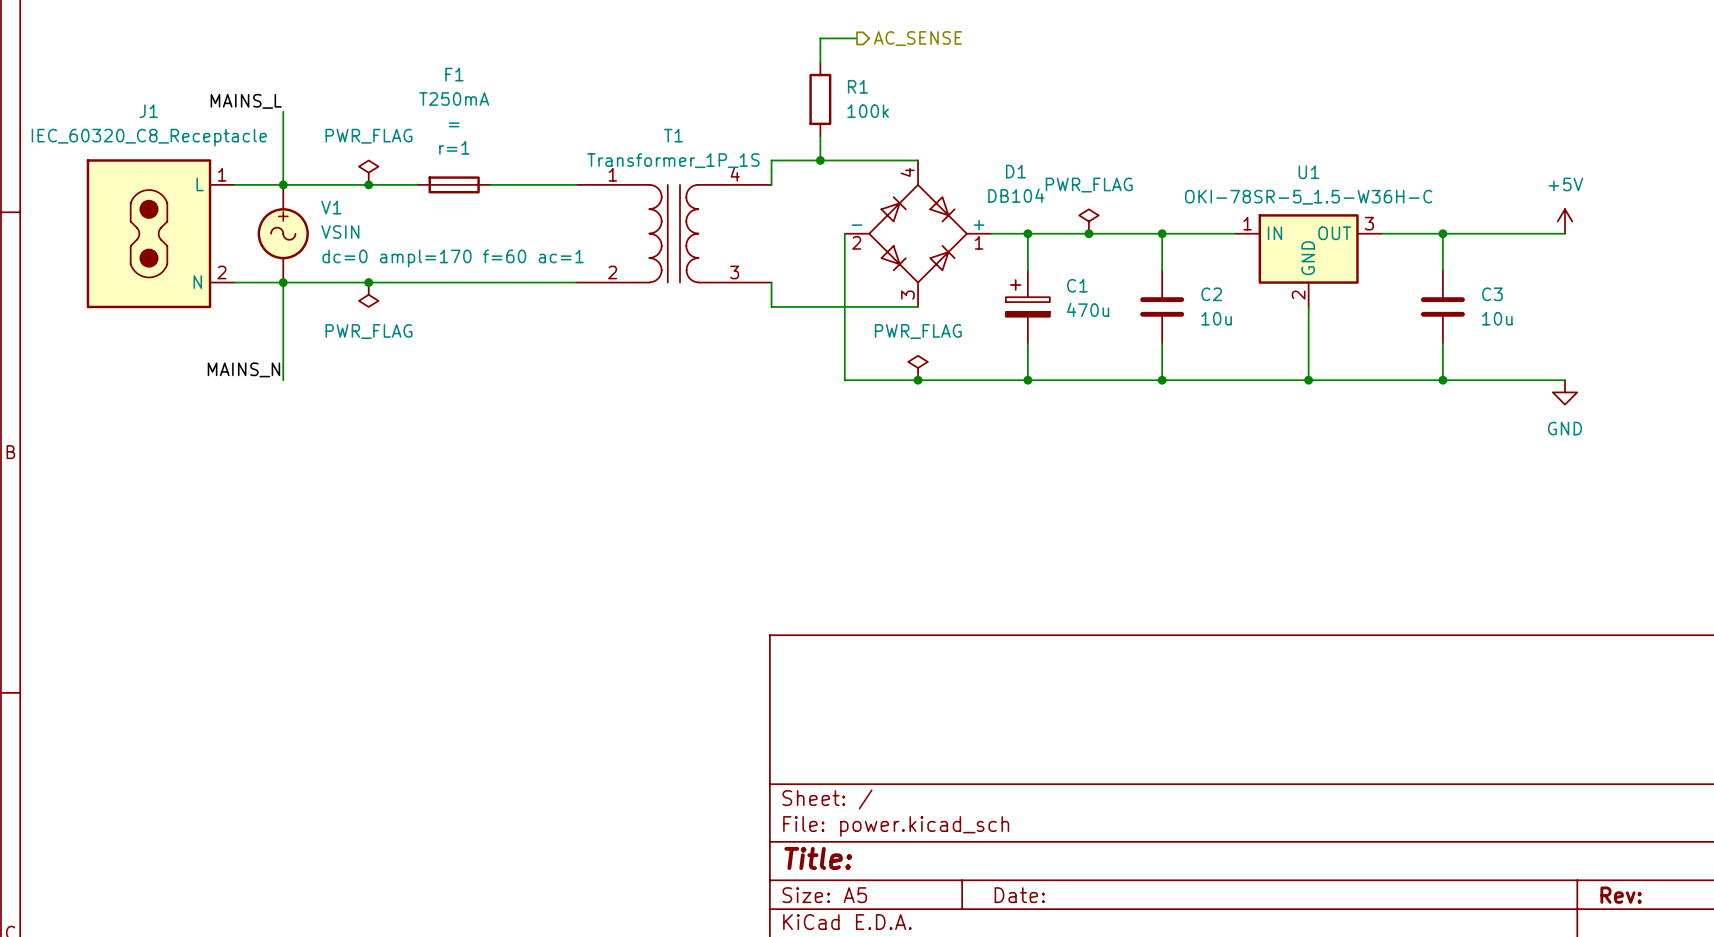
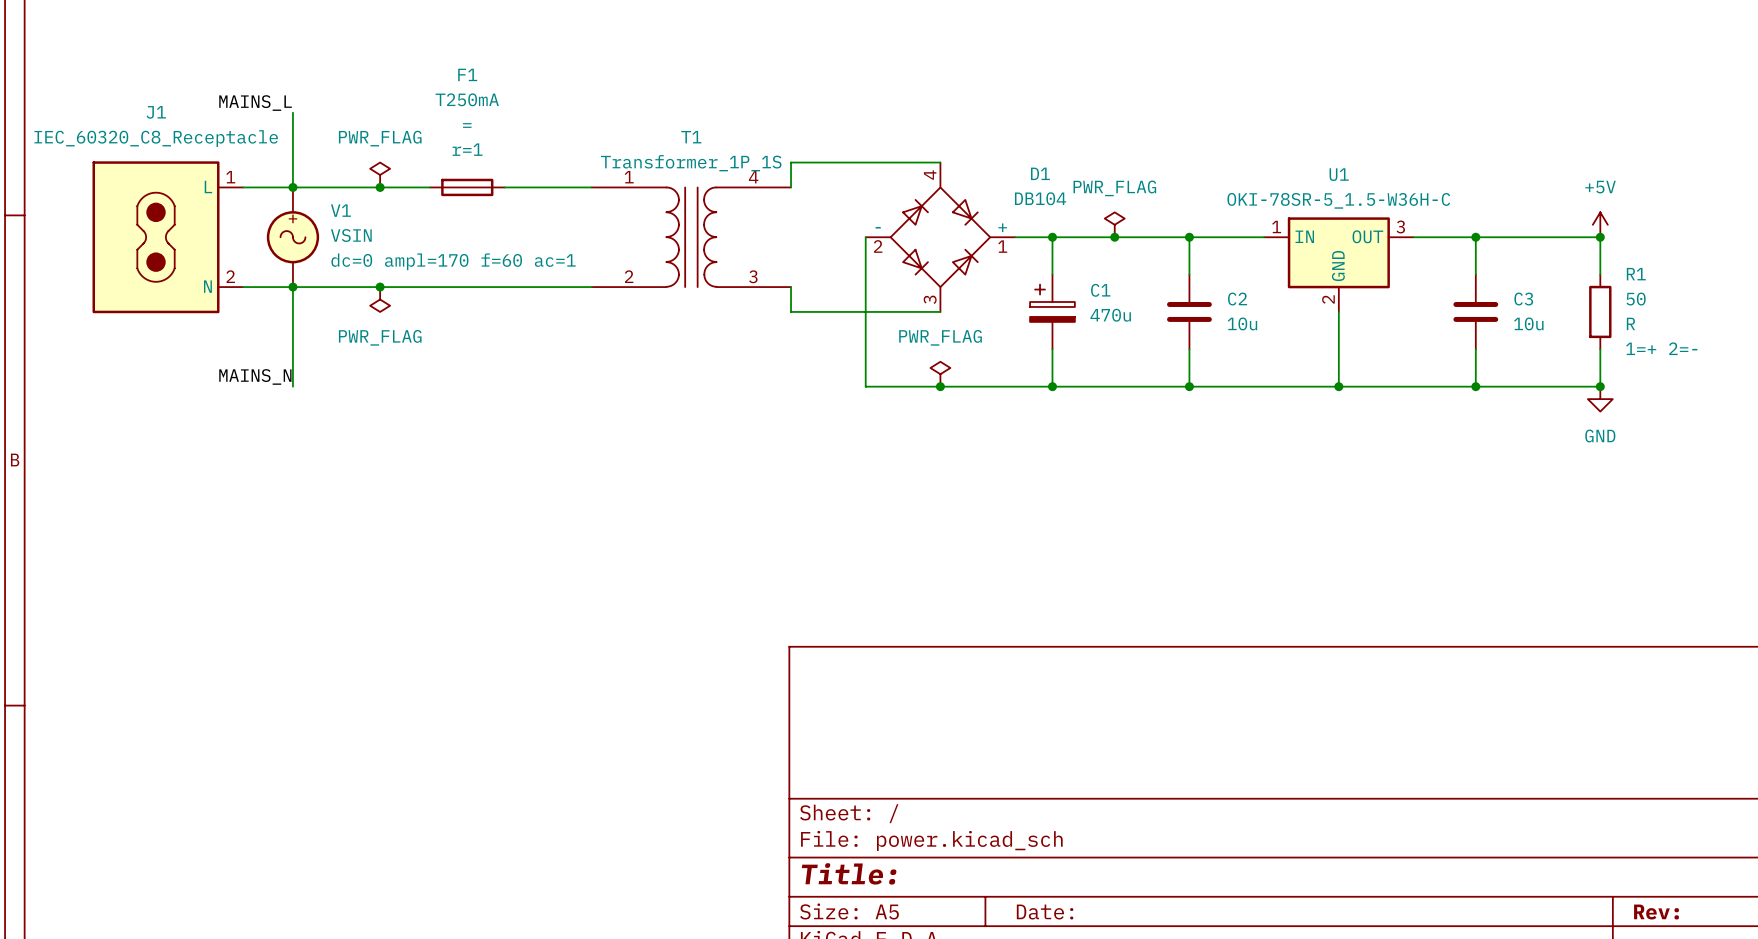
wire: (856, 38) (820, 38) (820, 62) -> none
hierarchical label: AC_SENSE (917, 38) -> none
R1 name position: R1 (857, 86) -> R1 (1636, 274)
R1 position: (820, 99) -> (1600, 311)
R1 value: 100k (868, 111) -> 50 (1636, 299)
wire: (820, 136) (820, 160) -> none
junction: (820, 160) -> none
wire: none -> (1600, 237) (1600, 274)
junction: none -> (1600, 237)
R1 text: none -> R (1630, 323)
wire: none -> (1600, 349) (1600, 386)
R1 text: none -> 1=+ 2=- (1661, 348)
junction: none -> (1600, 386)

